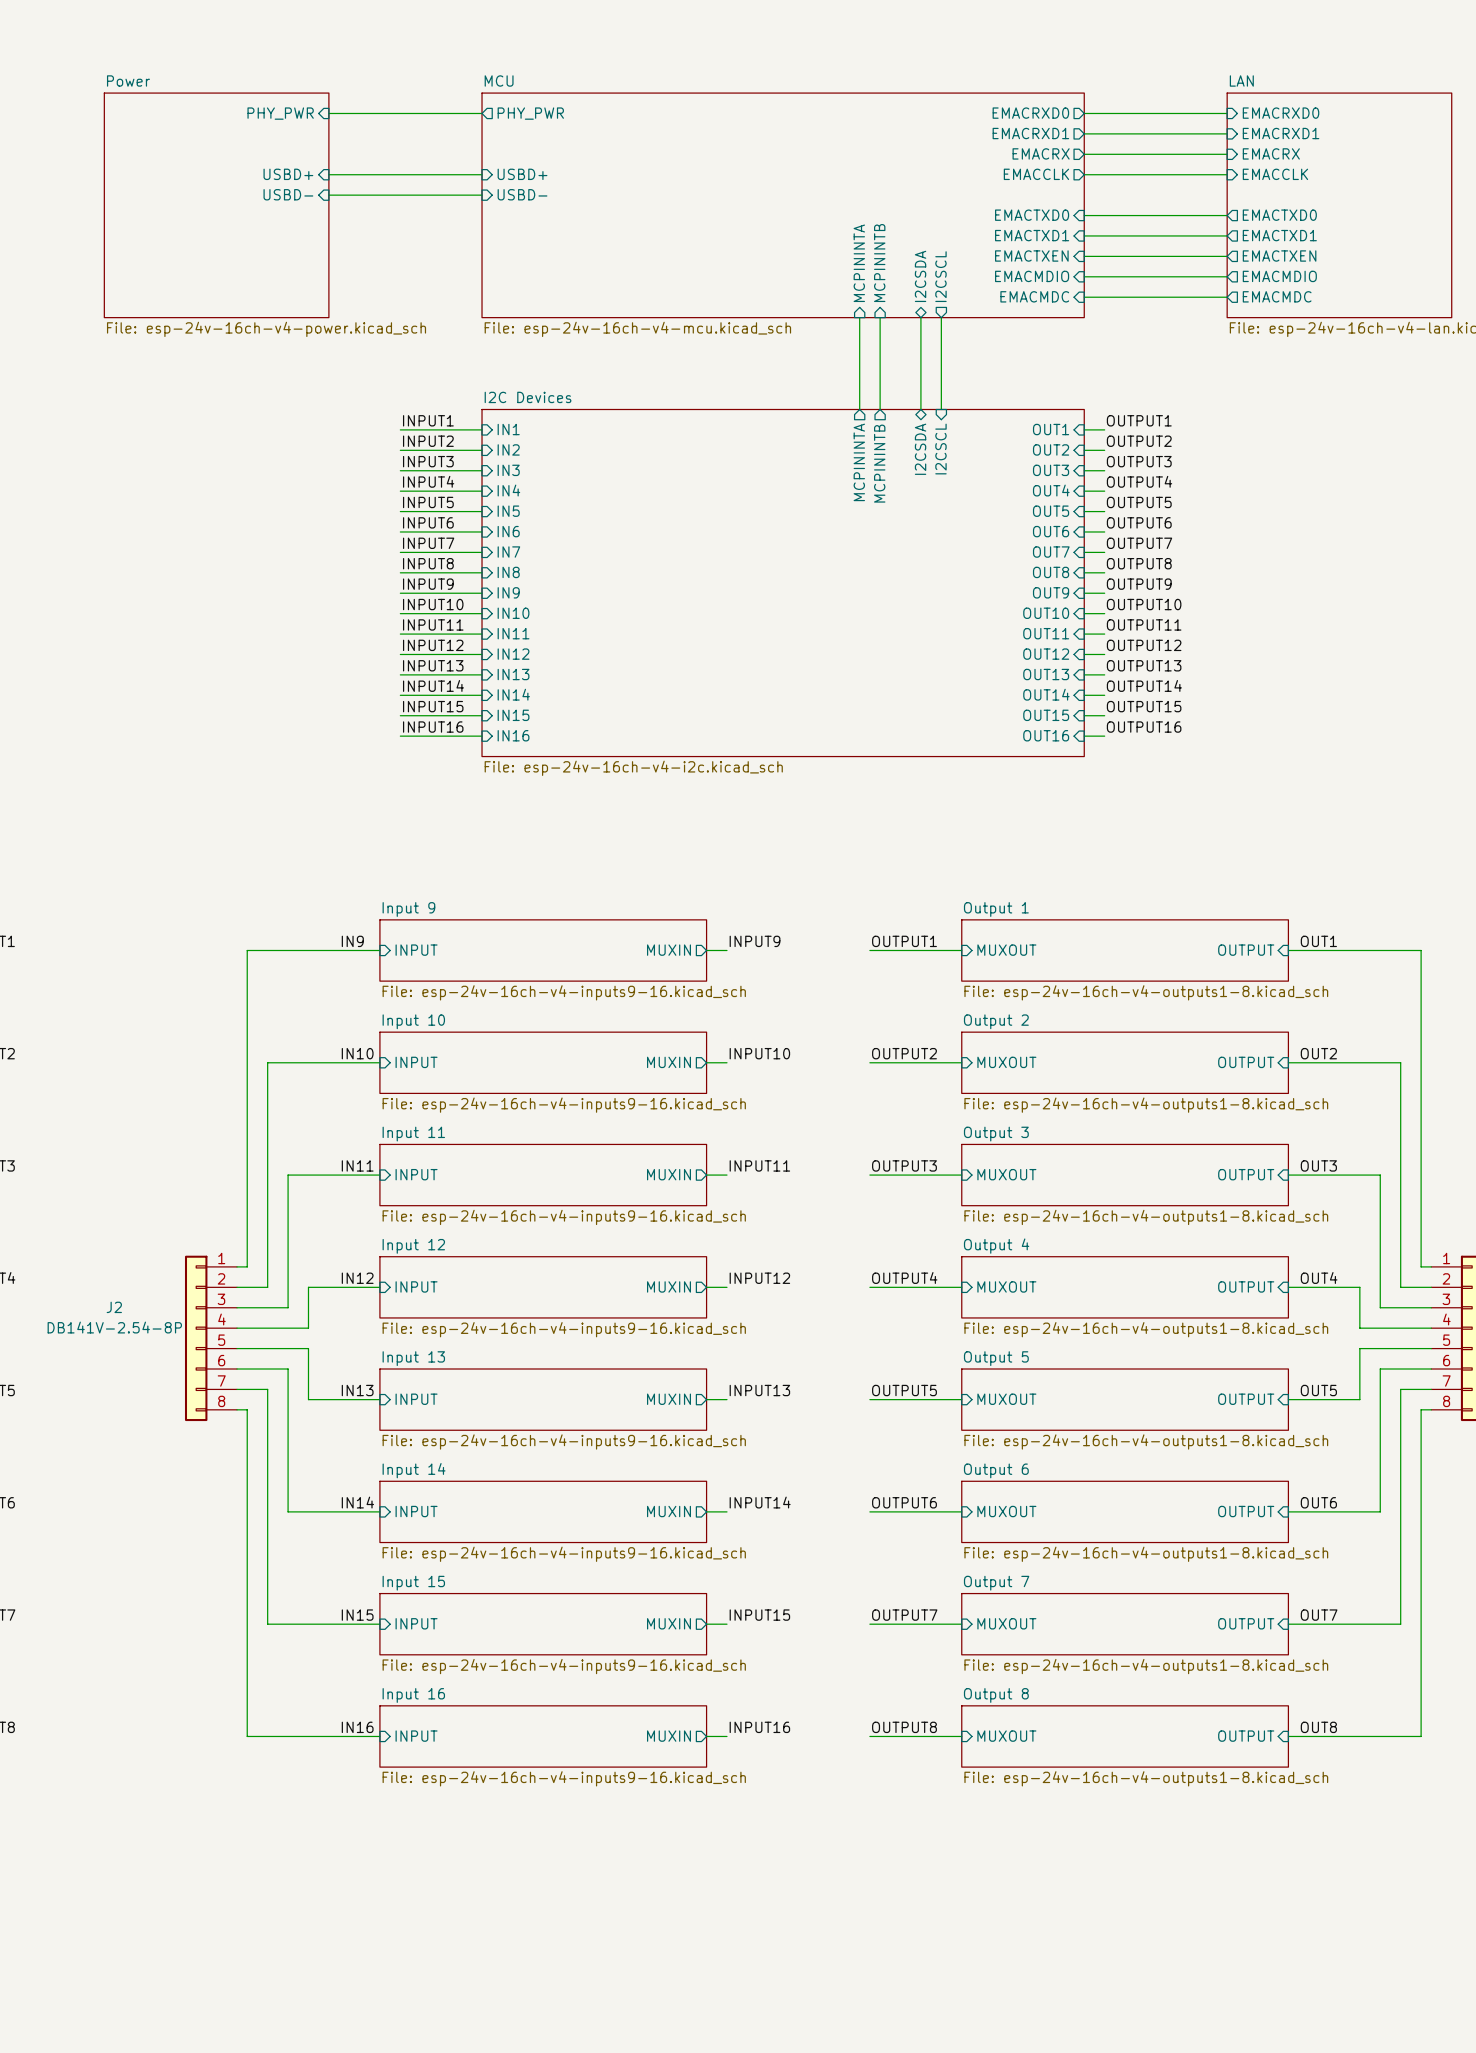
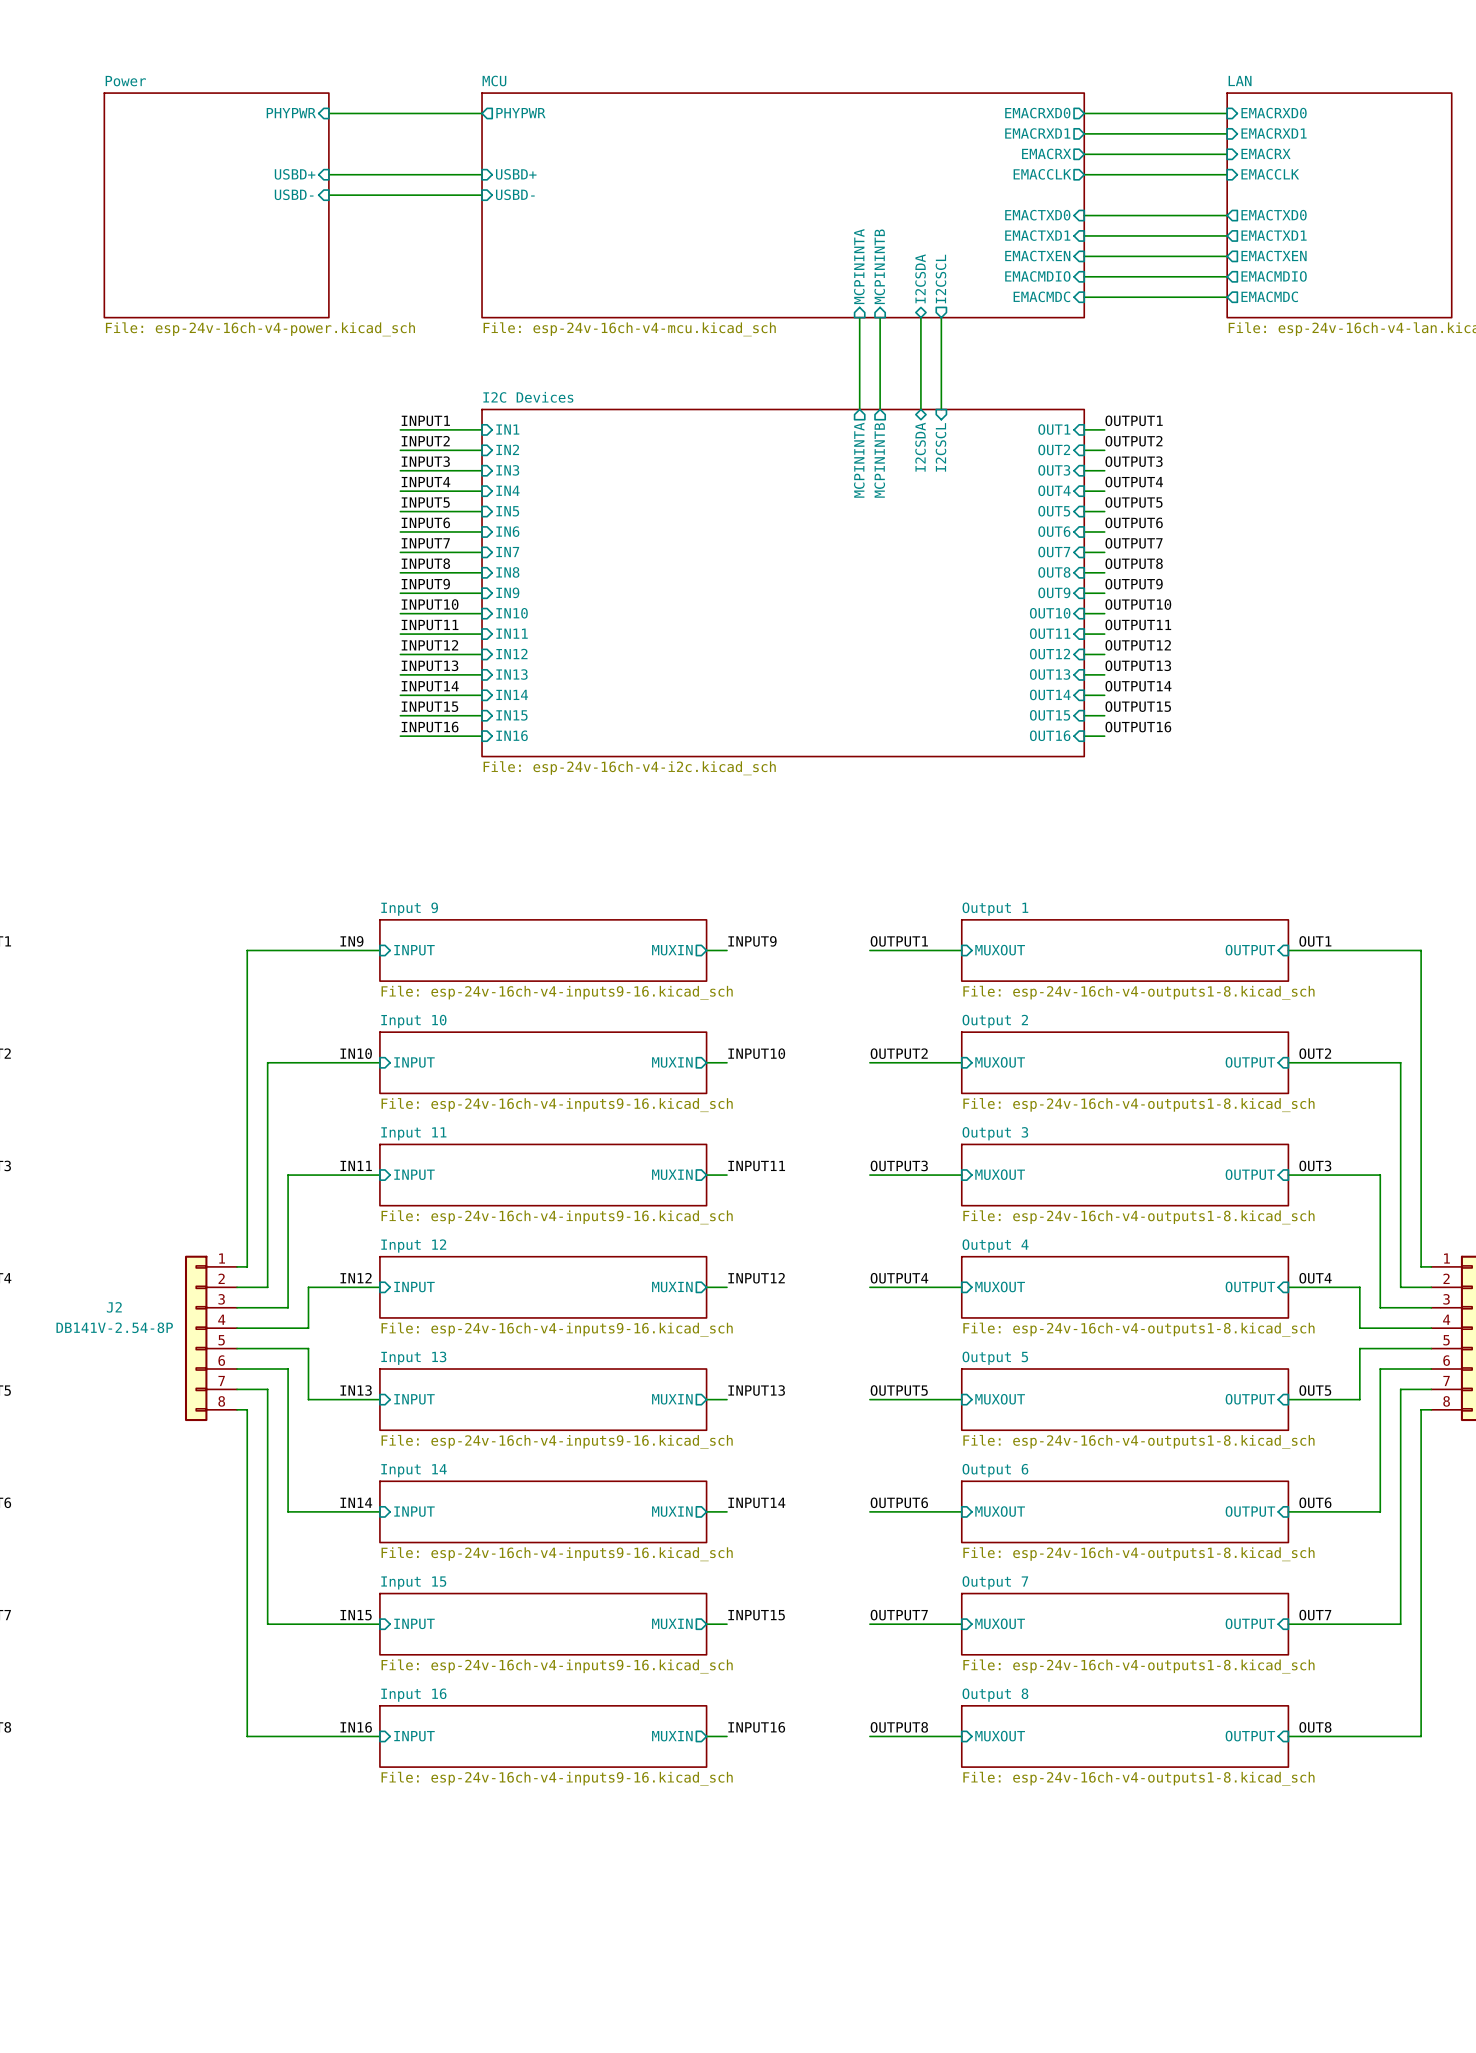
sheet pin: PHY_PWR (280, 113) -> PHYPWR (291, 113)
sheet pin: PHY_PWR (530, 113) -> PHYPWR (520, 113)

